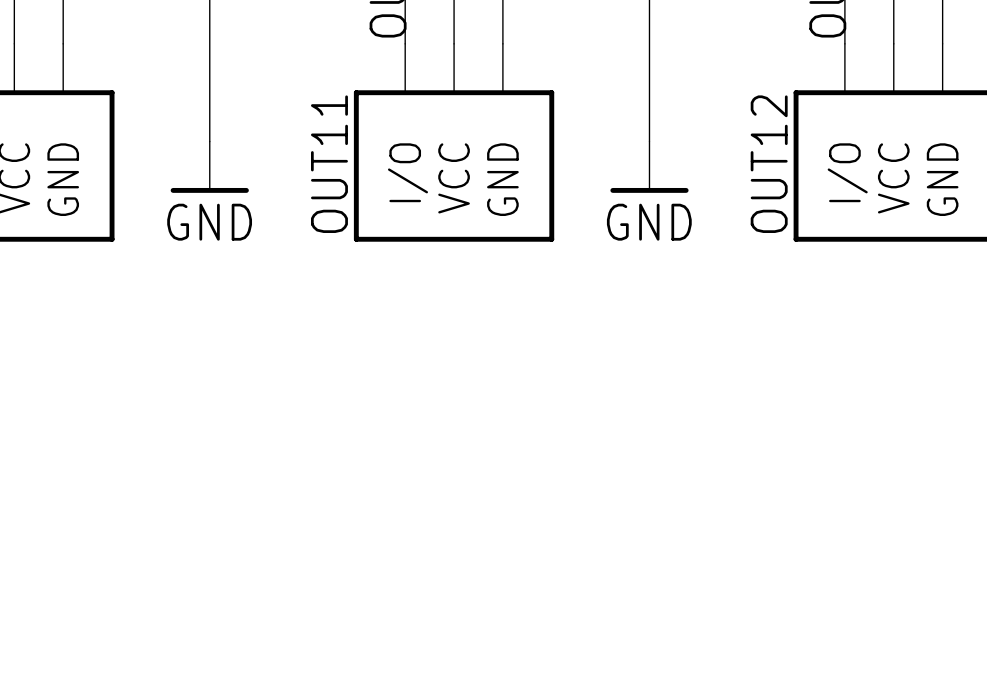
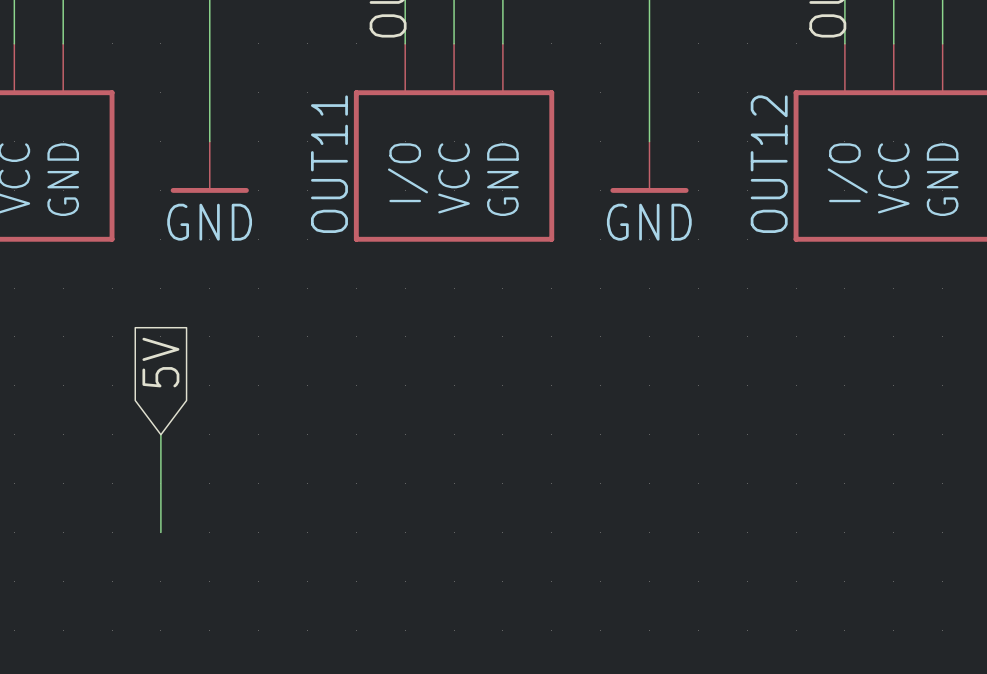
global label: none -> 5V (160, 362)
wire: none -> (160, 434) (160, 532)

